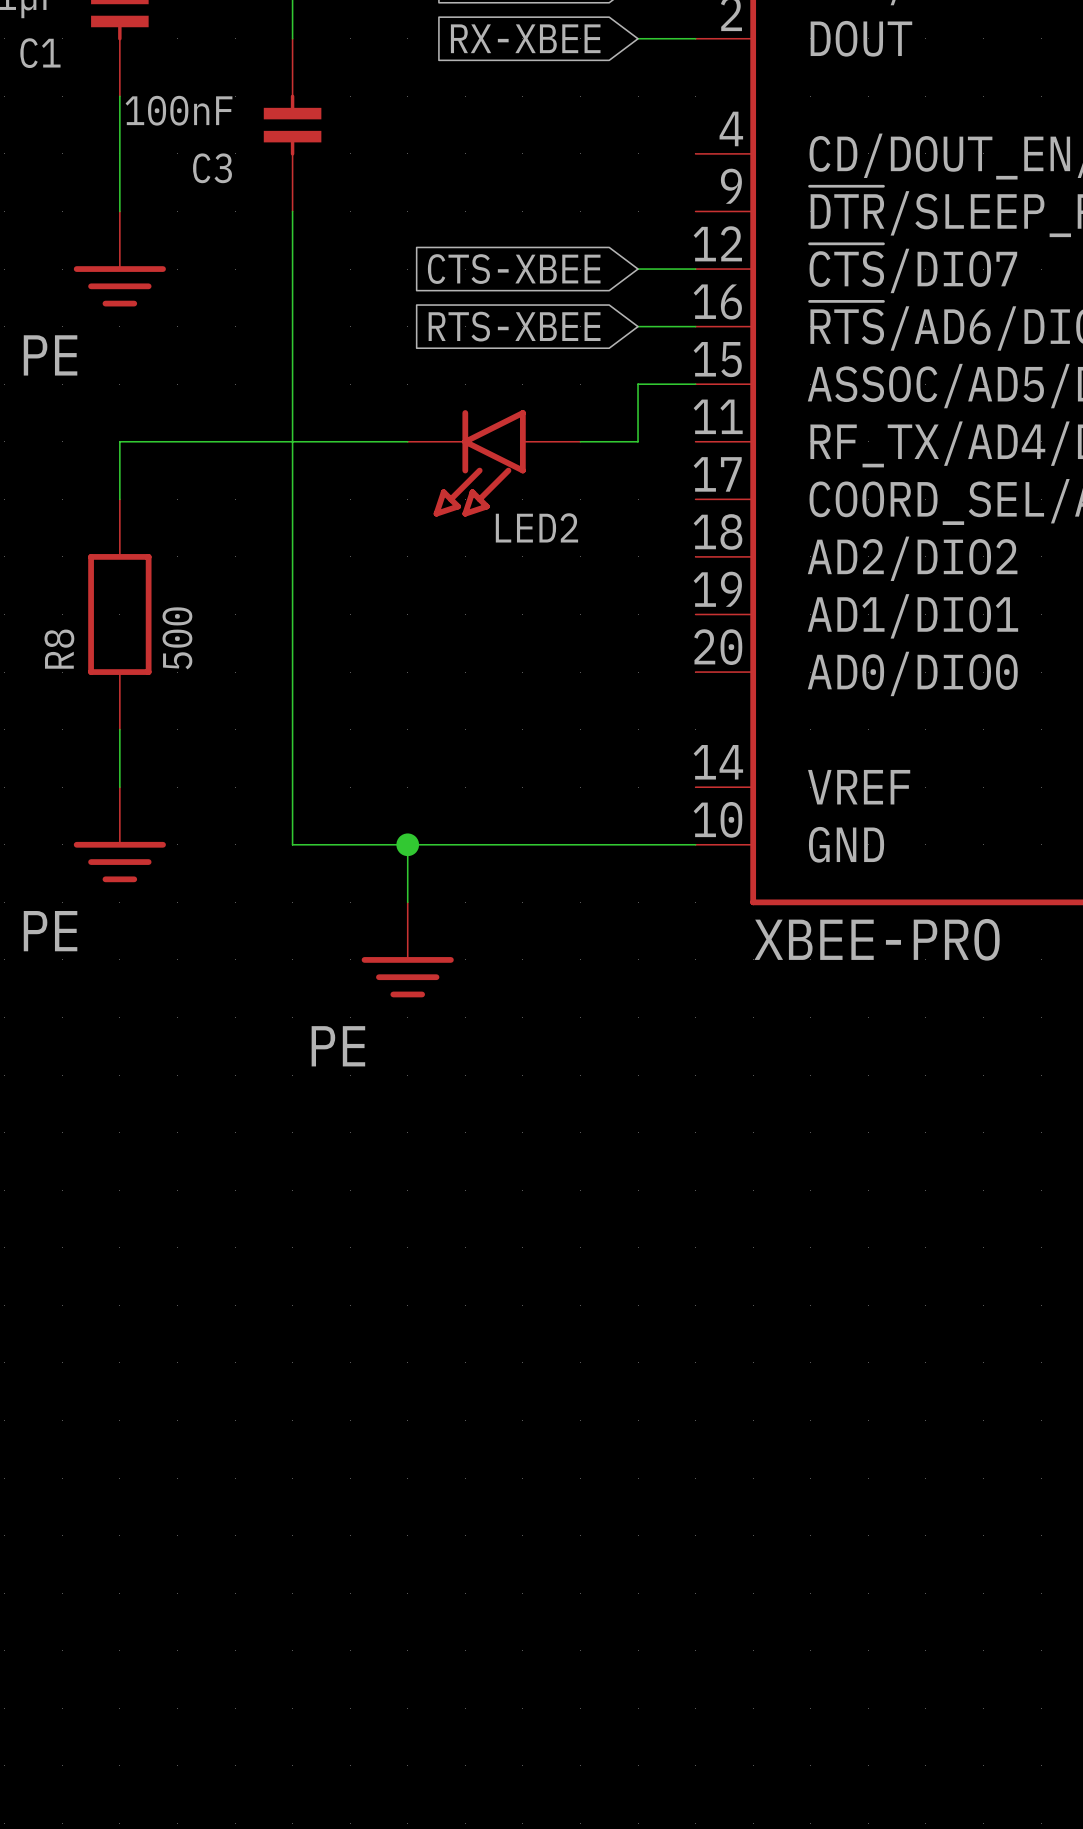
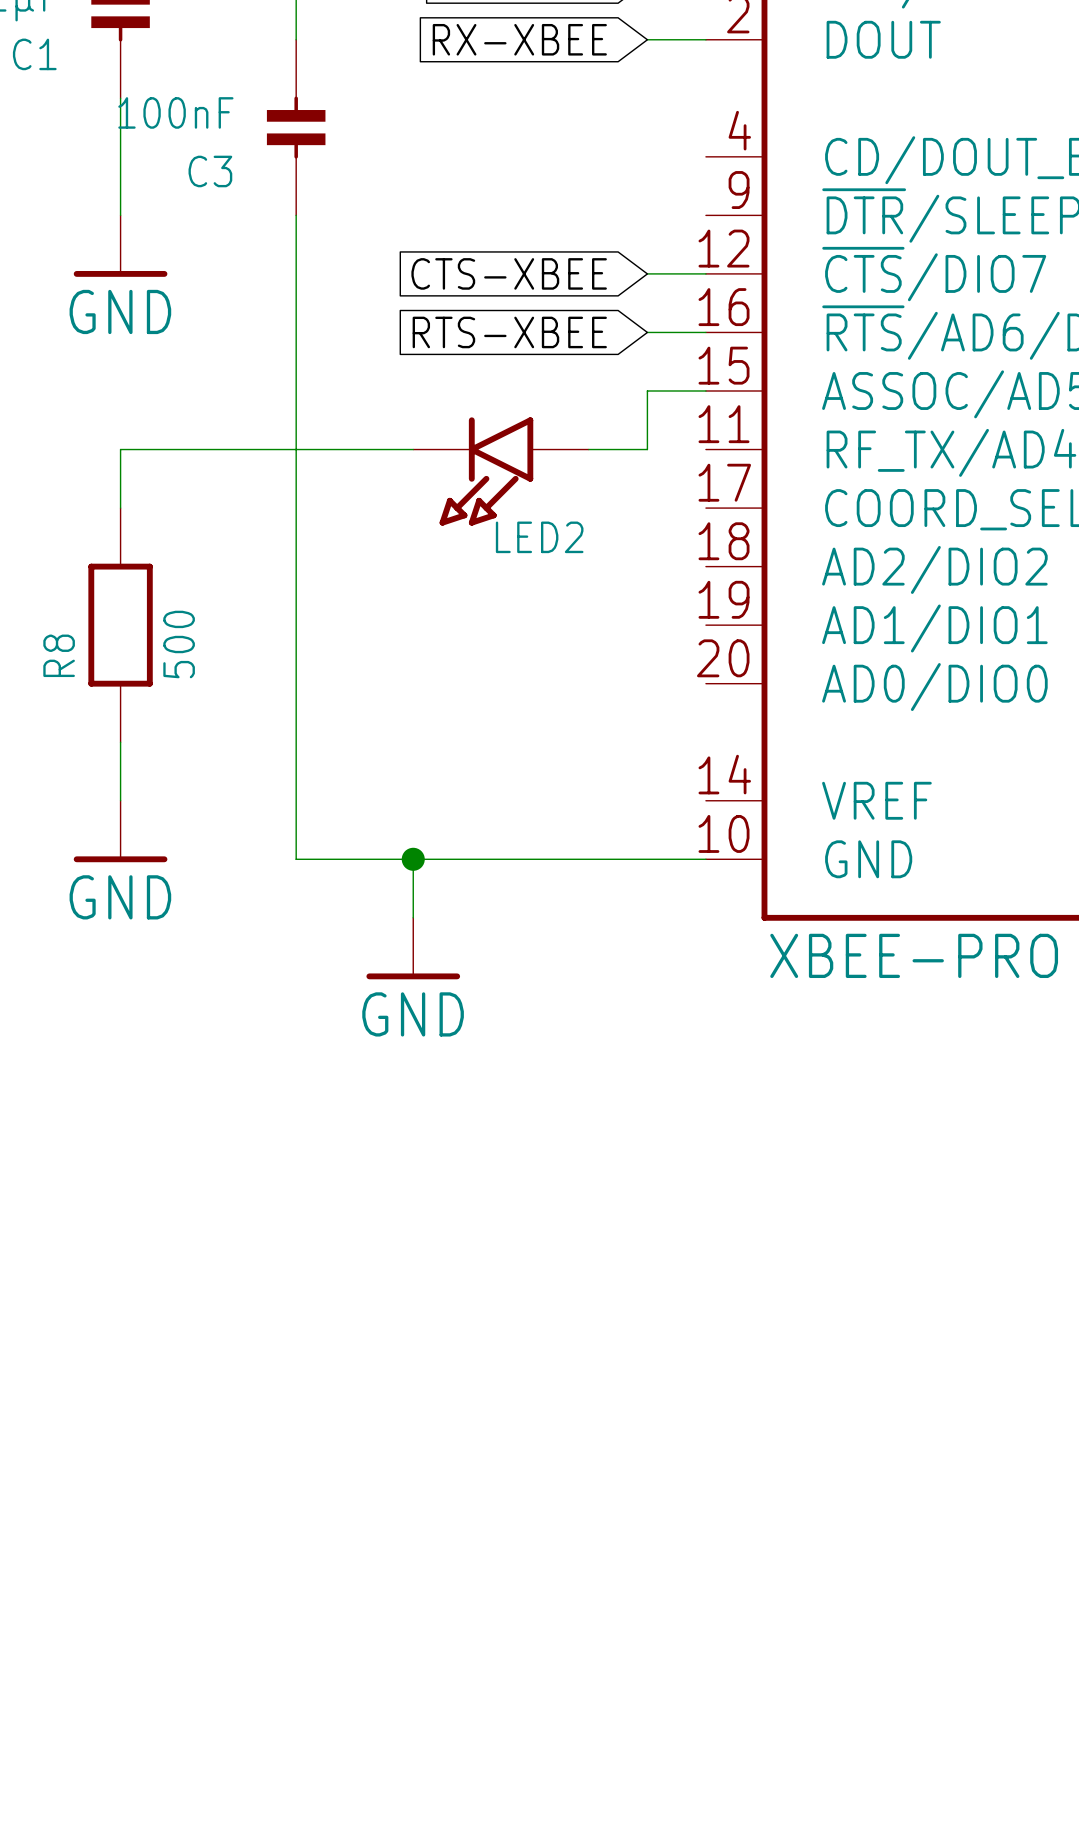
power symbol: PE (119, 258) -> GND (120, 246)
power symbol: PE (119, 834) -> GND (120, 831)
power symbol: PE (407, 949) -> GND (413, 948)

